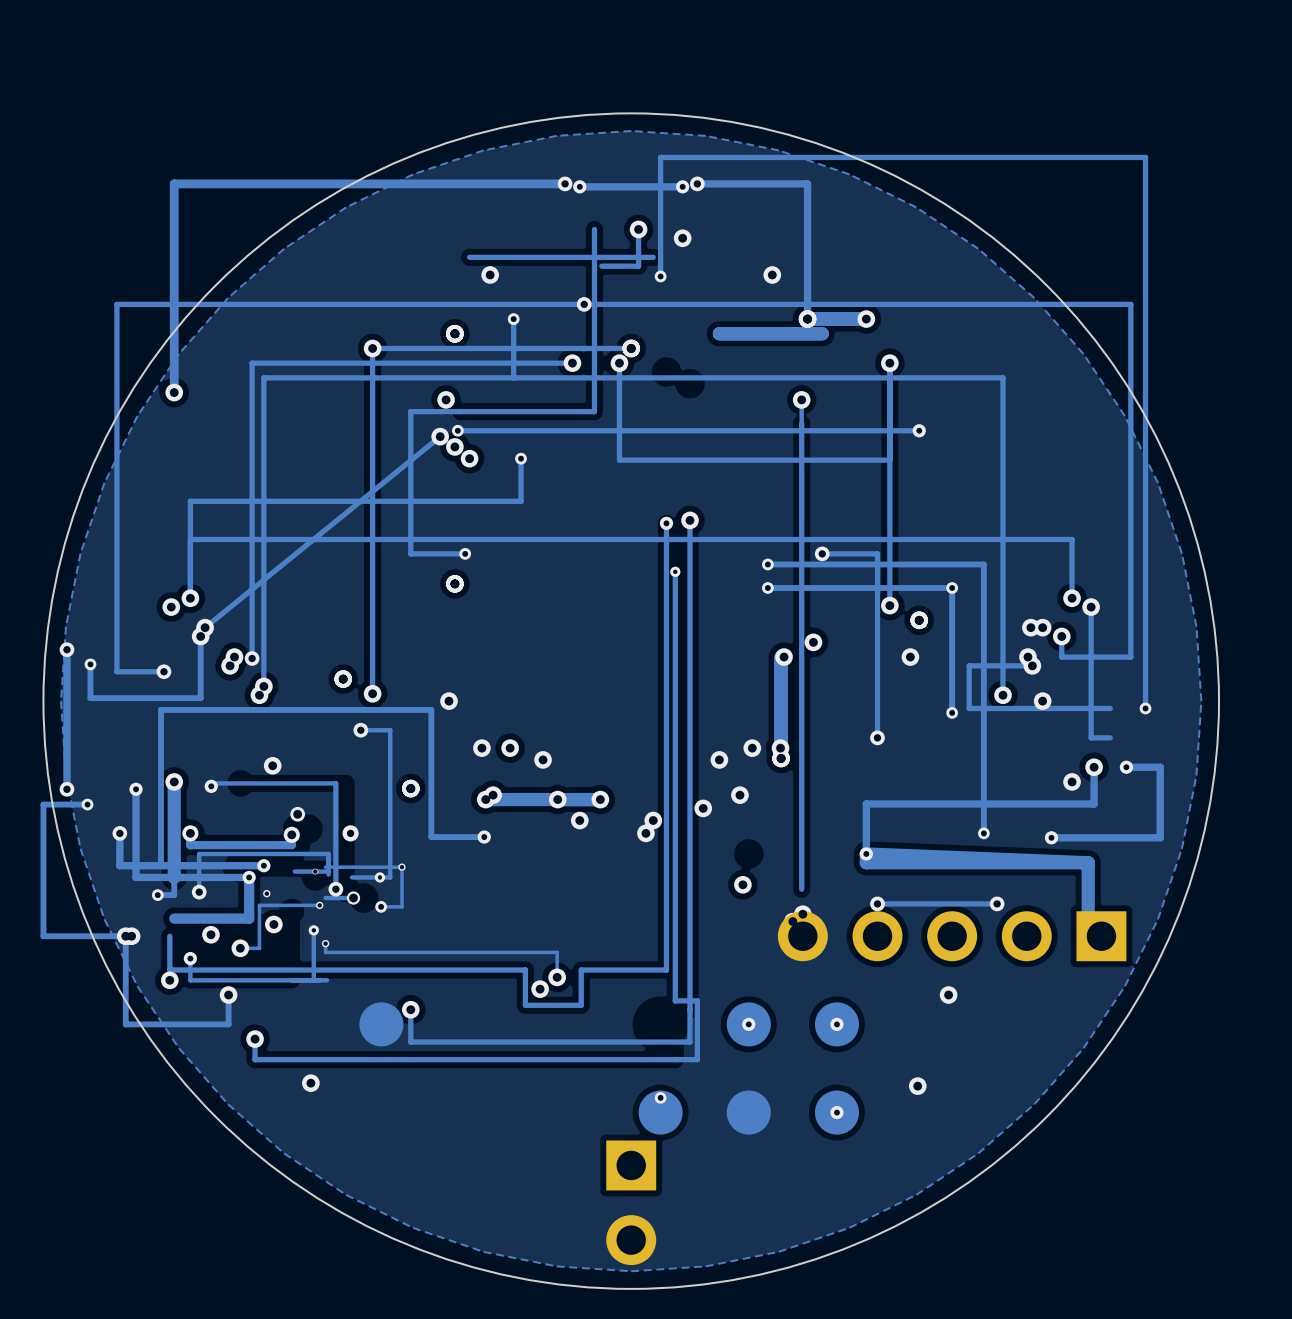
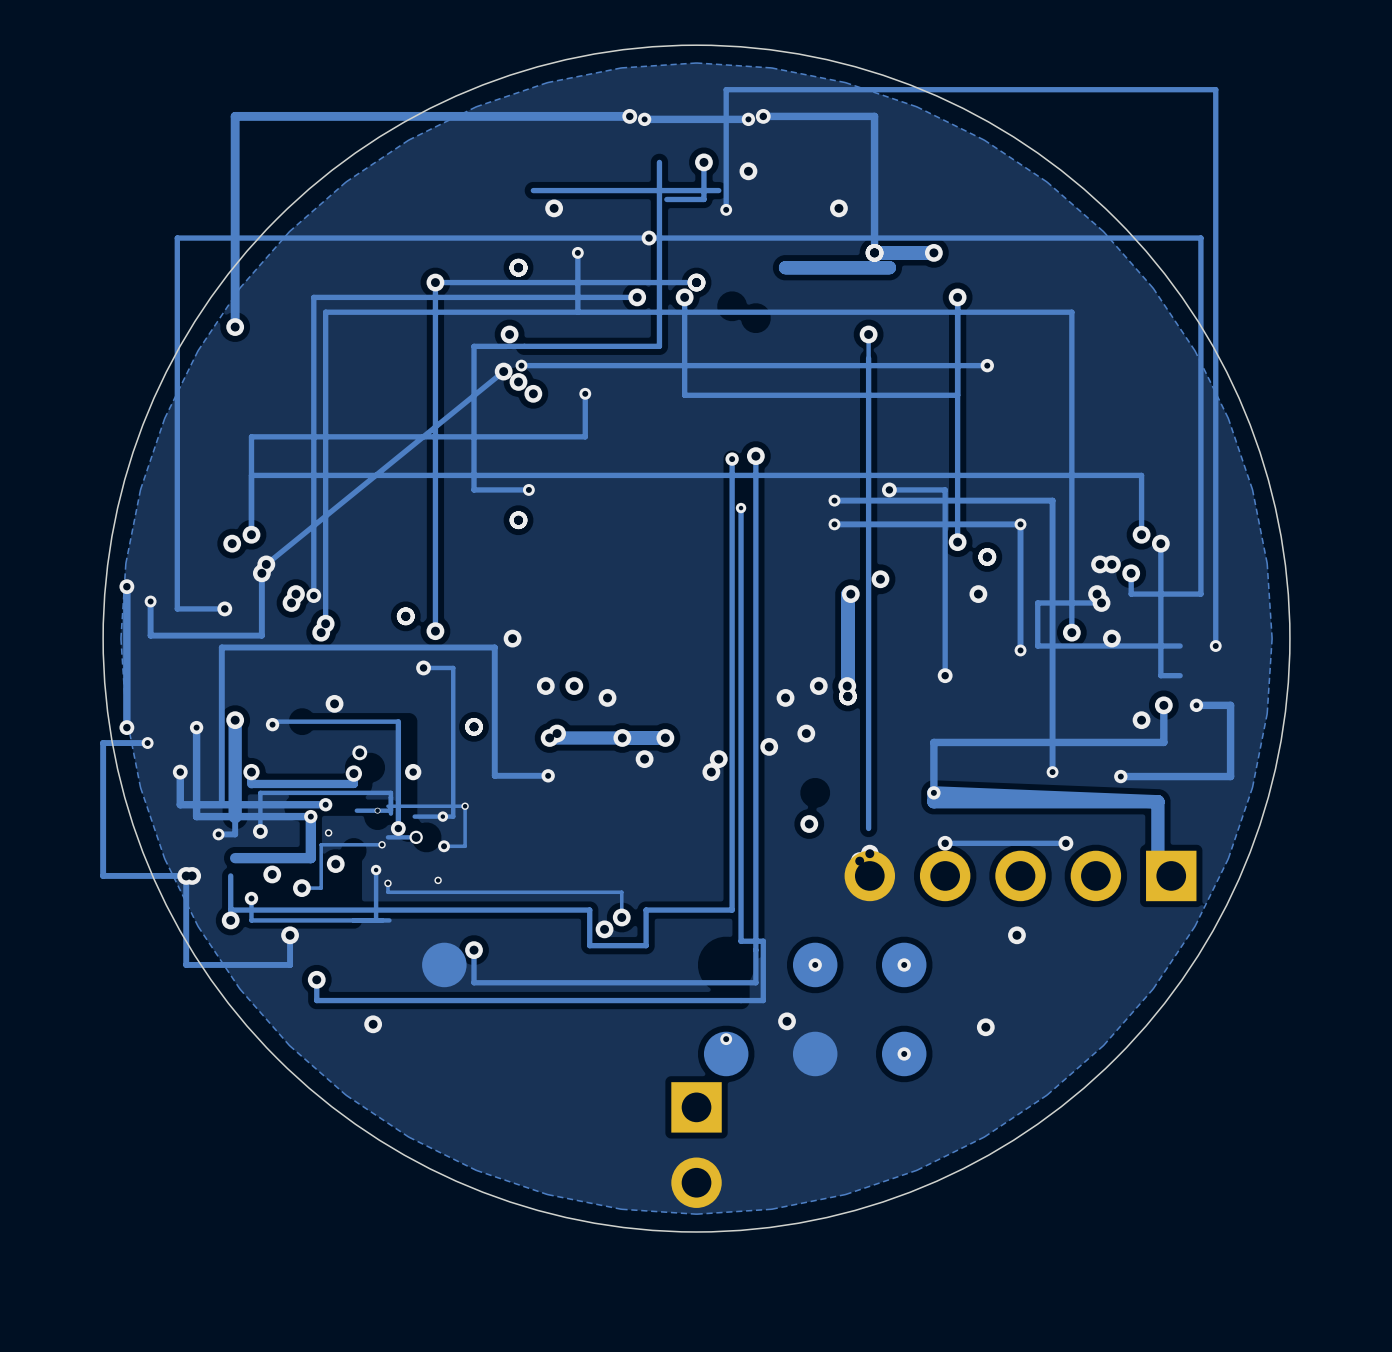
via: none -> (438, 880)
via: none -> (787, 1021)

